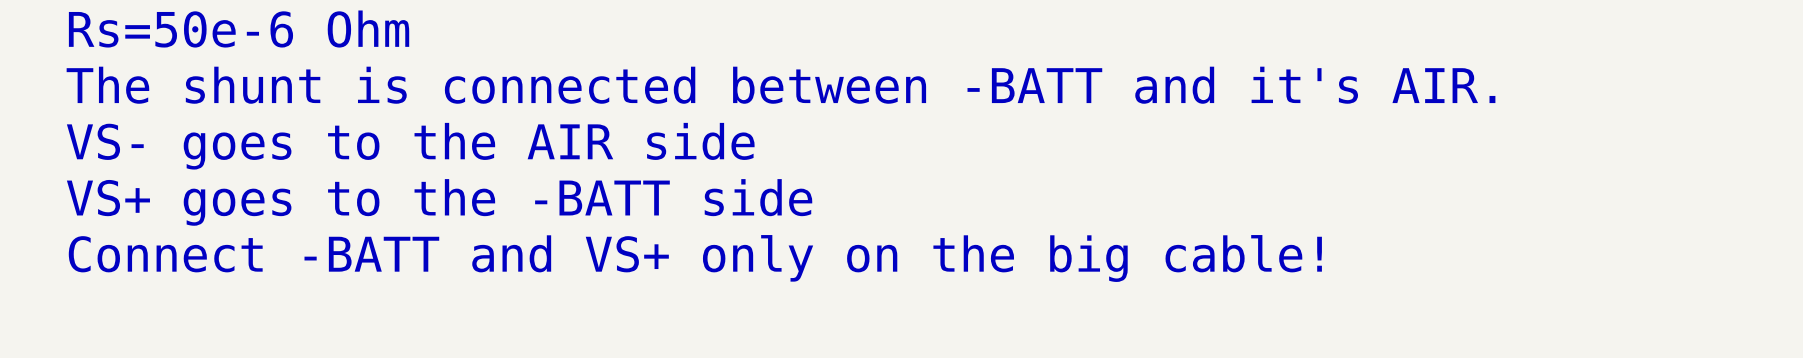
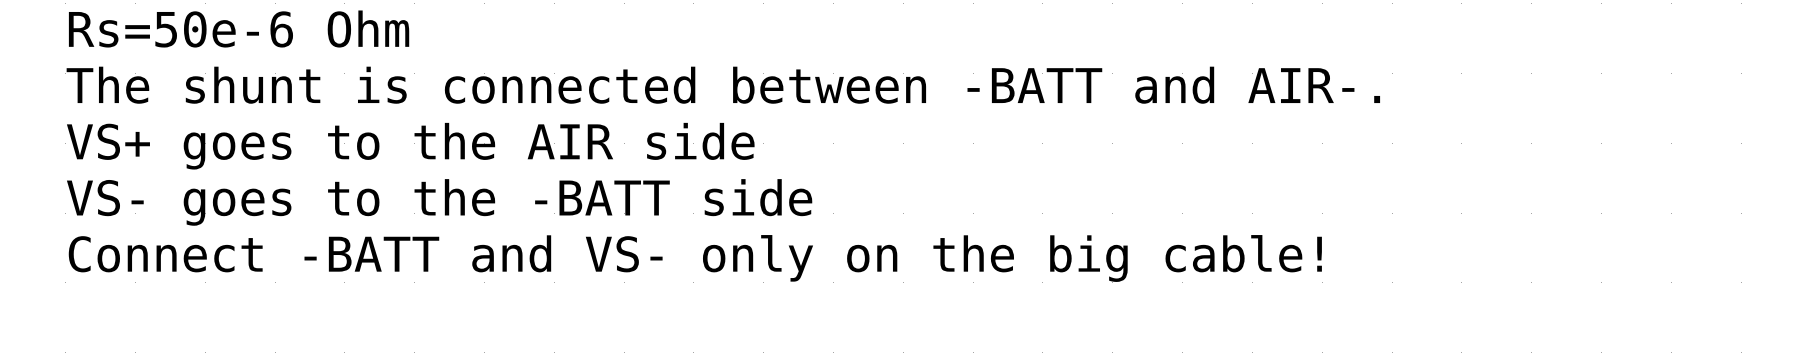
text: The shunt is connected between -BATT and it's AIR. (781, 85) -> The shunt is connected between -BATT and AIR-. (723, 85)
text: VS- goes to the AIR side (410, 146) -> VS+ goes to the AIR side (410, 146)
text: VS+ goes to the -BATT side (439, 202) -> VS- goes to the -BATT side (439, 202)
text: Connect -BATT and VS+ only on the big cable! (695, 258) -> Connect -BATT and VS- only on the big cable! (695, 258)

